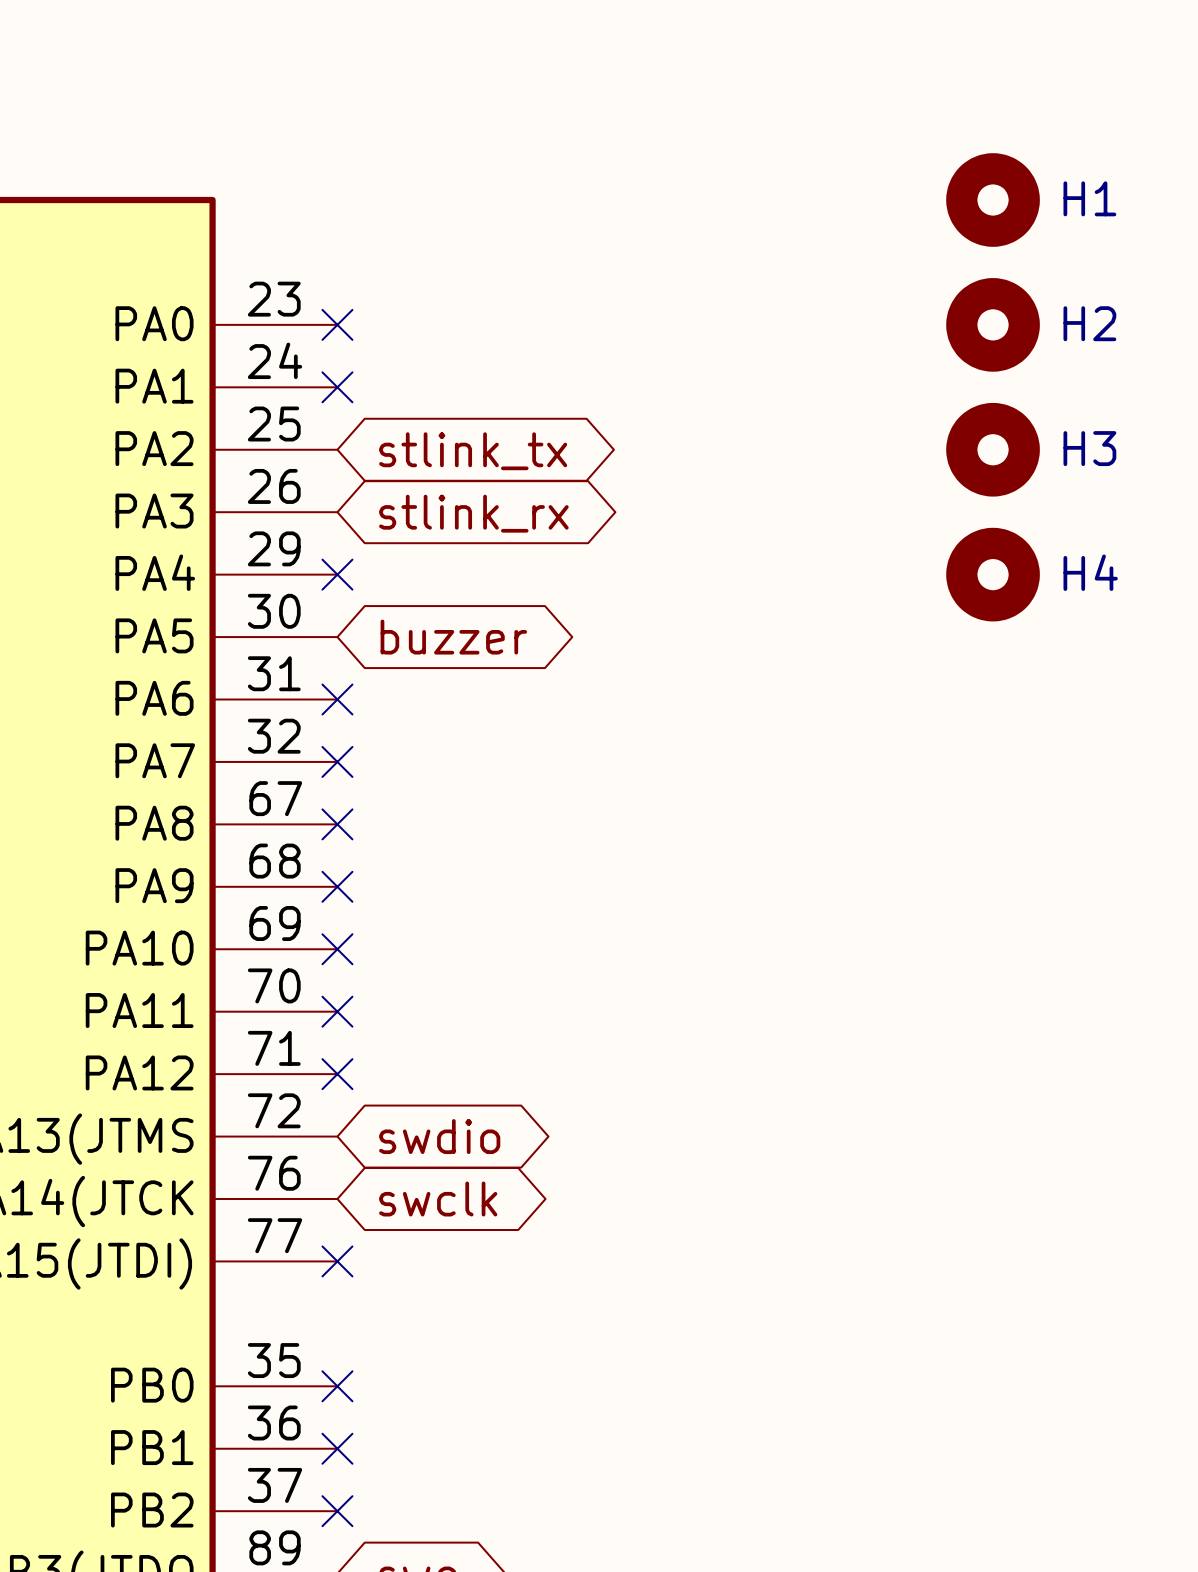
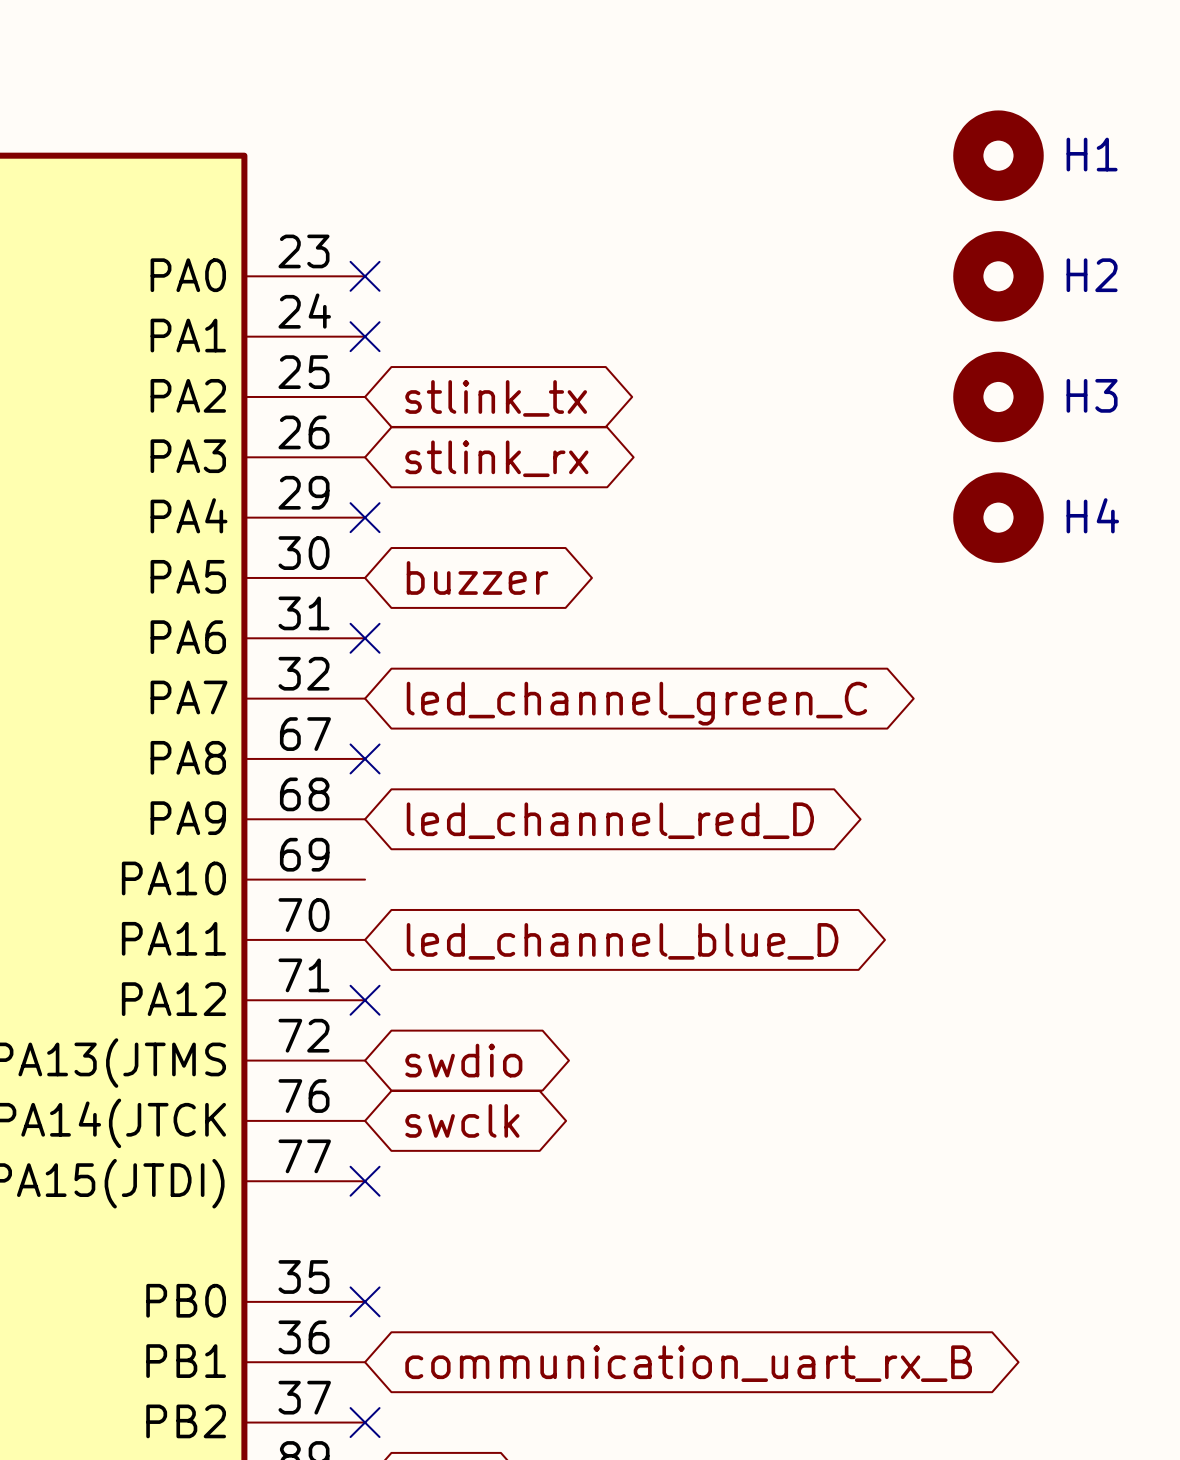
no-connect mark: (337, 761) -> none
global label: none -> led_channel_green_C (636, 703)
no-connect mark: (337, 886) -> none
global label: none -> led_channel_red_D (610, 820)
no-connect mark: (337, 949) -> none
no-connect mark: (337, 1011) -> none
global label: none -> led_channel_blue_D (622, 941)
no-connect mark: (337, 1448) -> none
global label: none -> communication_uart_rx_B (688, 1363)

